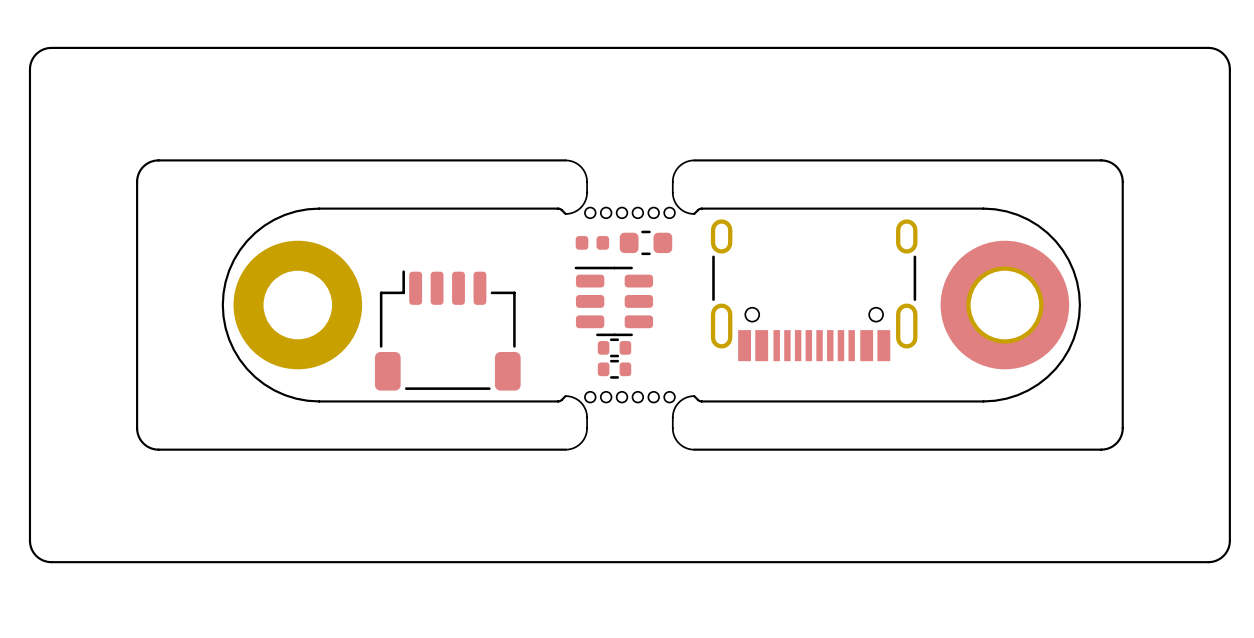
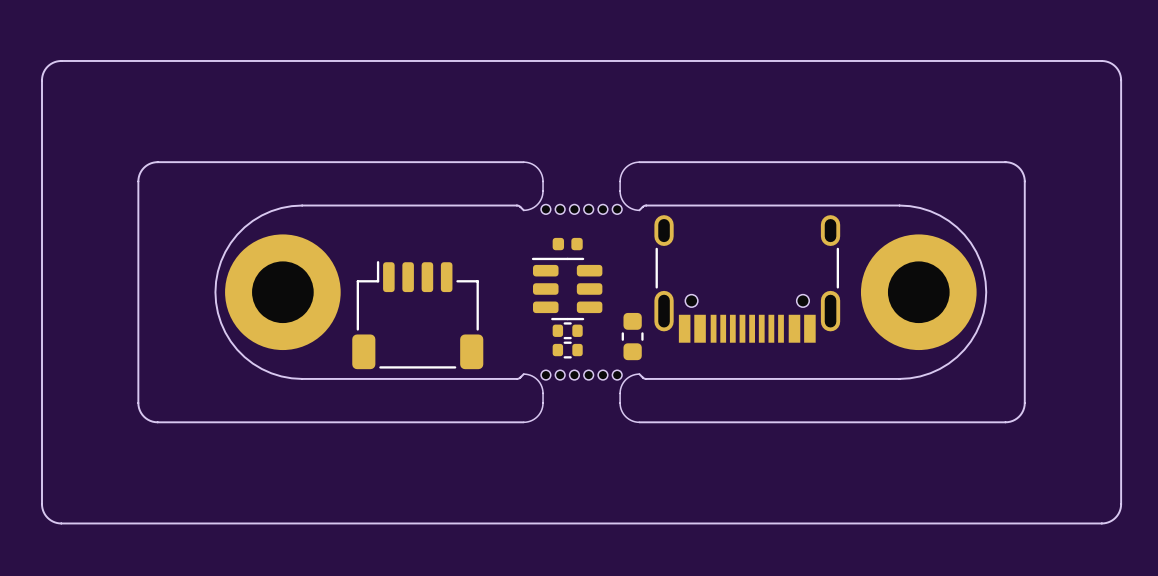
part position: (592, 242) -> (567, 244)
part rotation: 0° (645, 242) -> 90° clockwise (632, 336)
part position: (645, 242) -> (632, 336)

